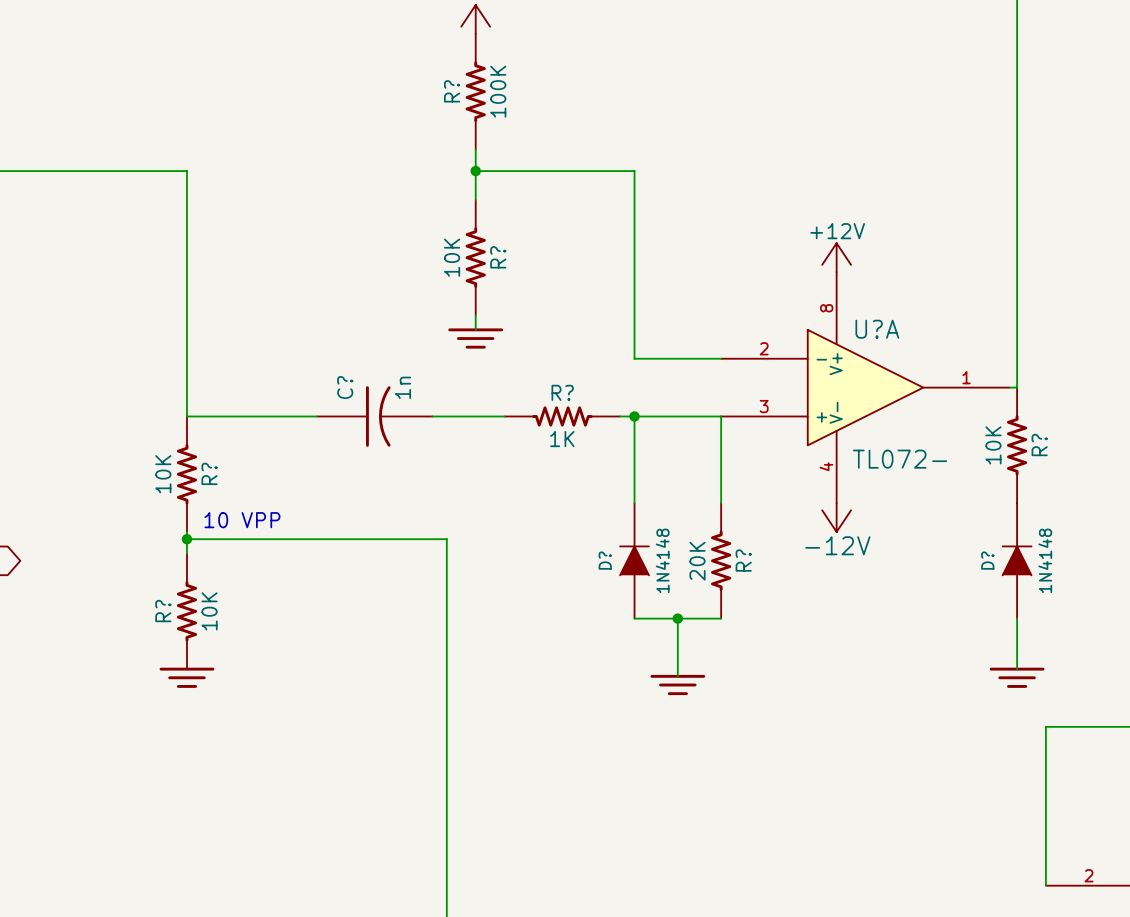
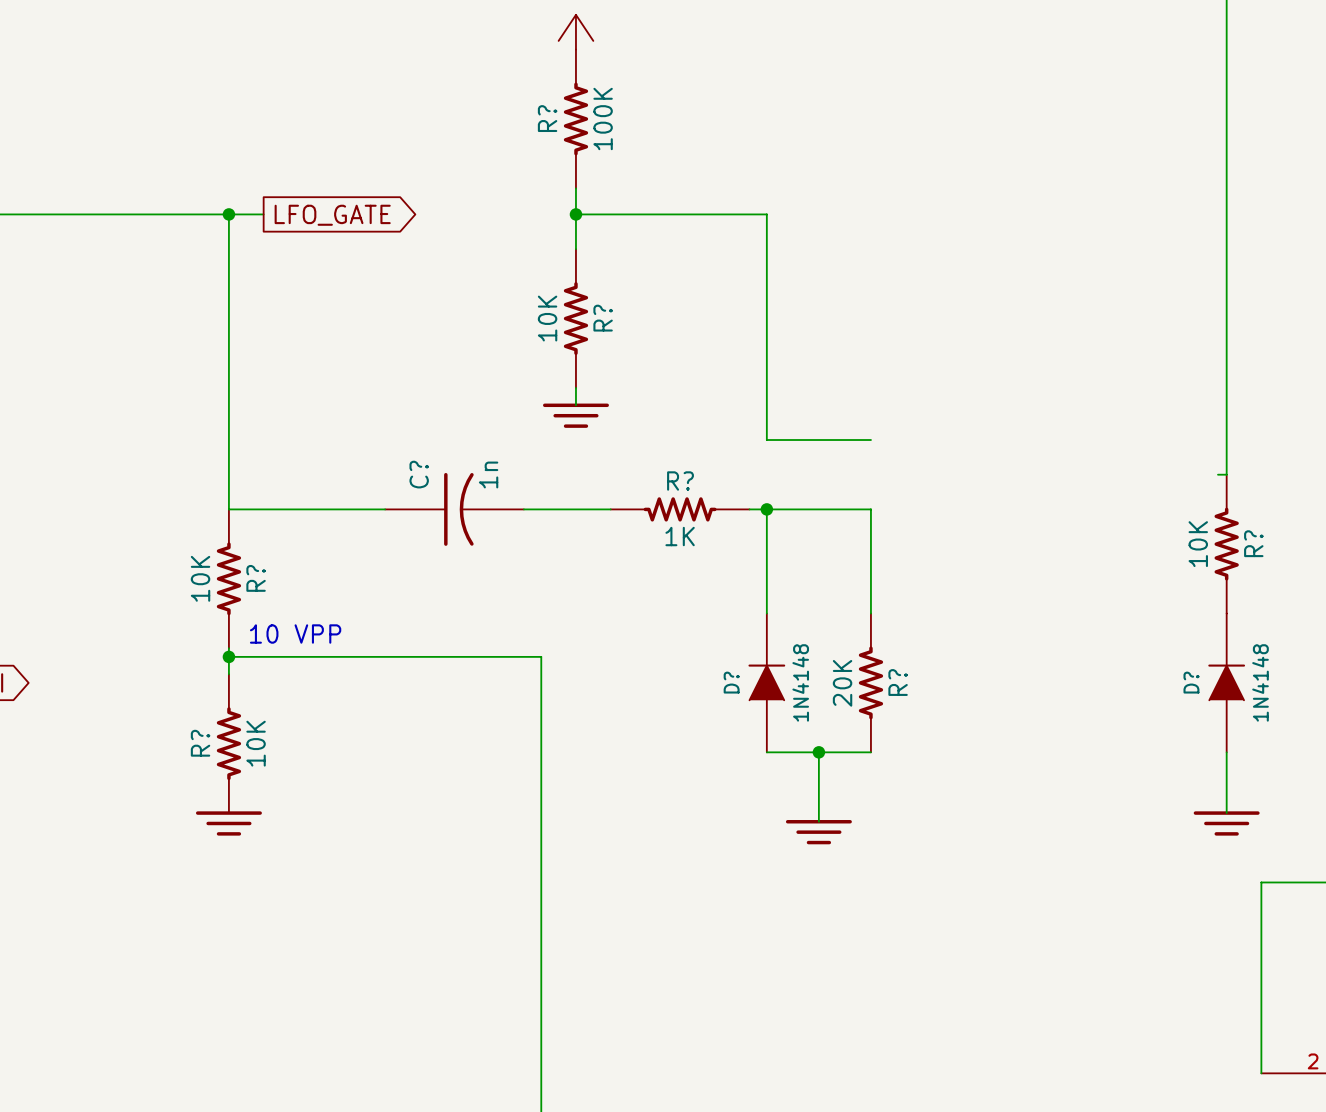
wire: none -> (228, 214) (263, 214)
junction: none -> (228, 214)
global label: none -> LFO_GATE (332, 215)
power symbol: +12V (836, 257) -> none
U?A: TL072- (865, 387) -> none
power symbol: -12V (836, 517) -> none

